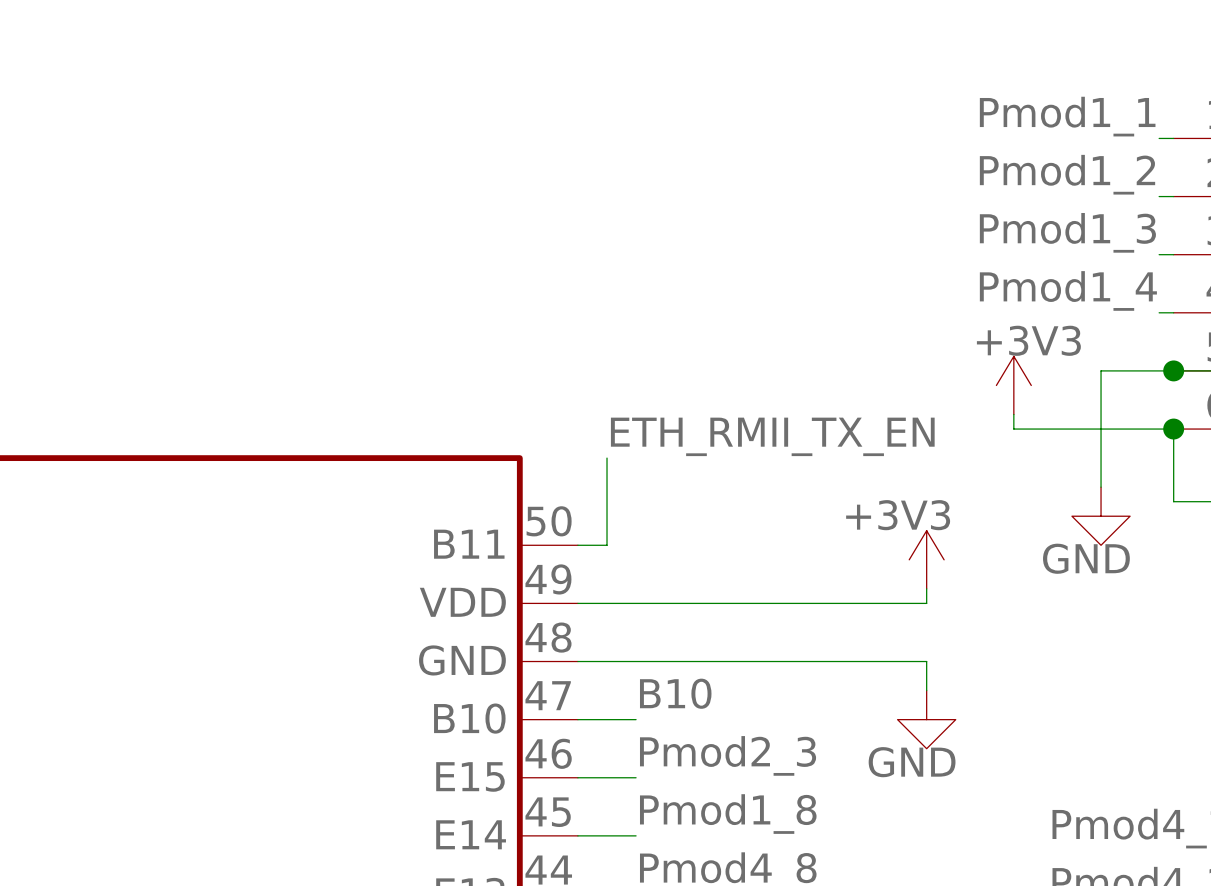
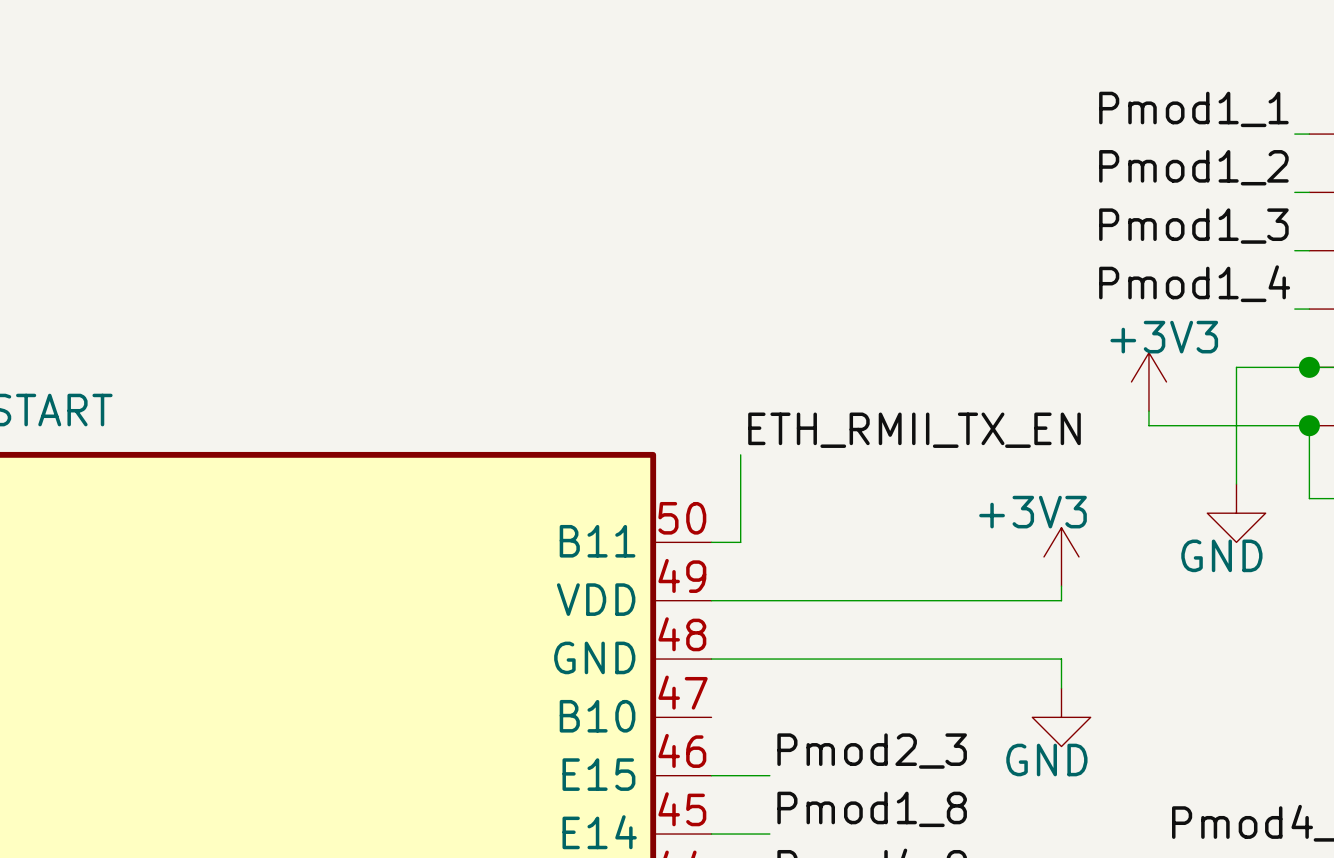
label: B10 (675, 693) -> none
wire: (577, 719) (636, 719) -> none

